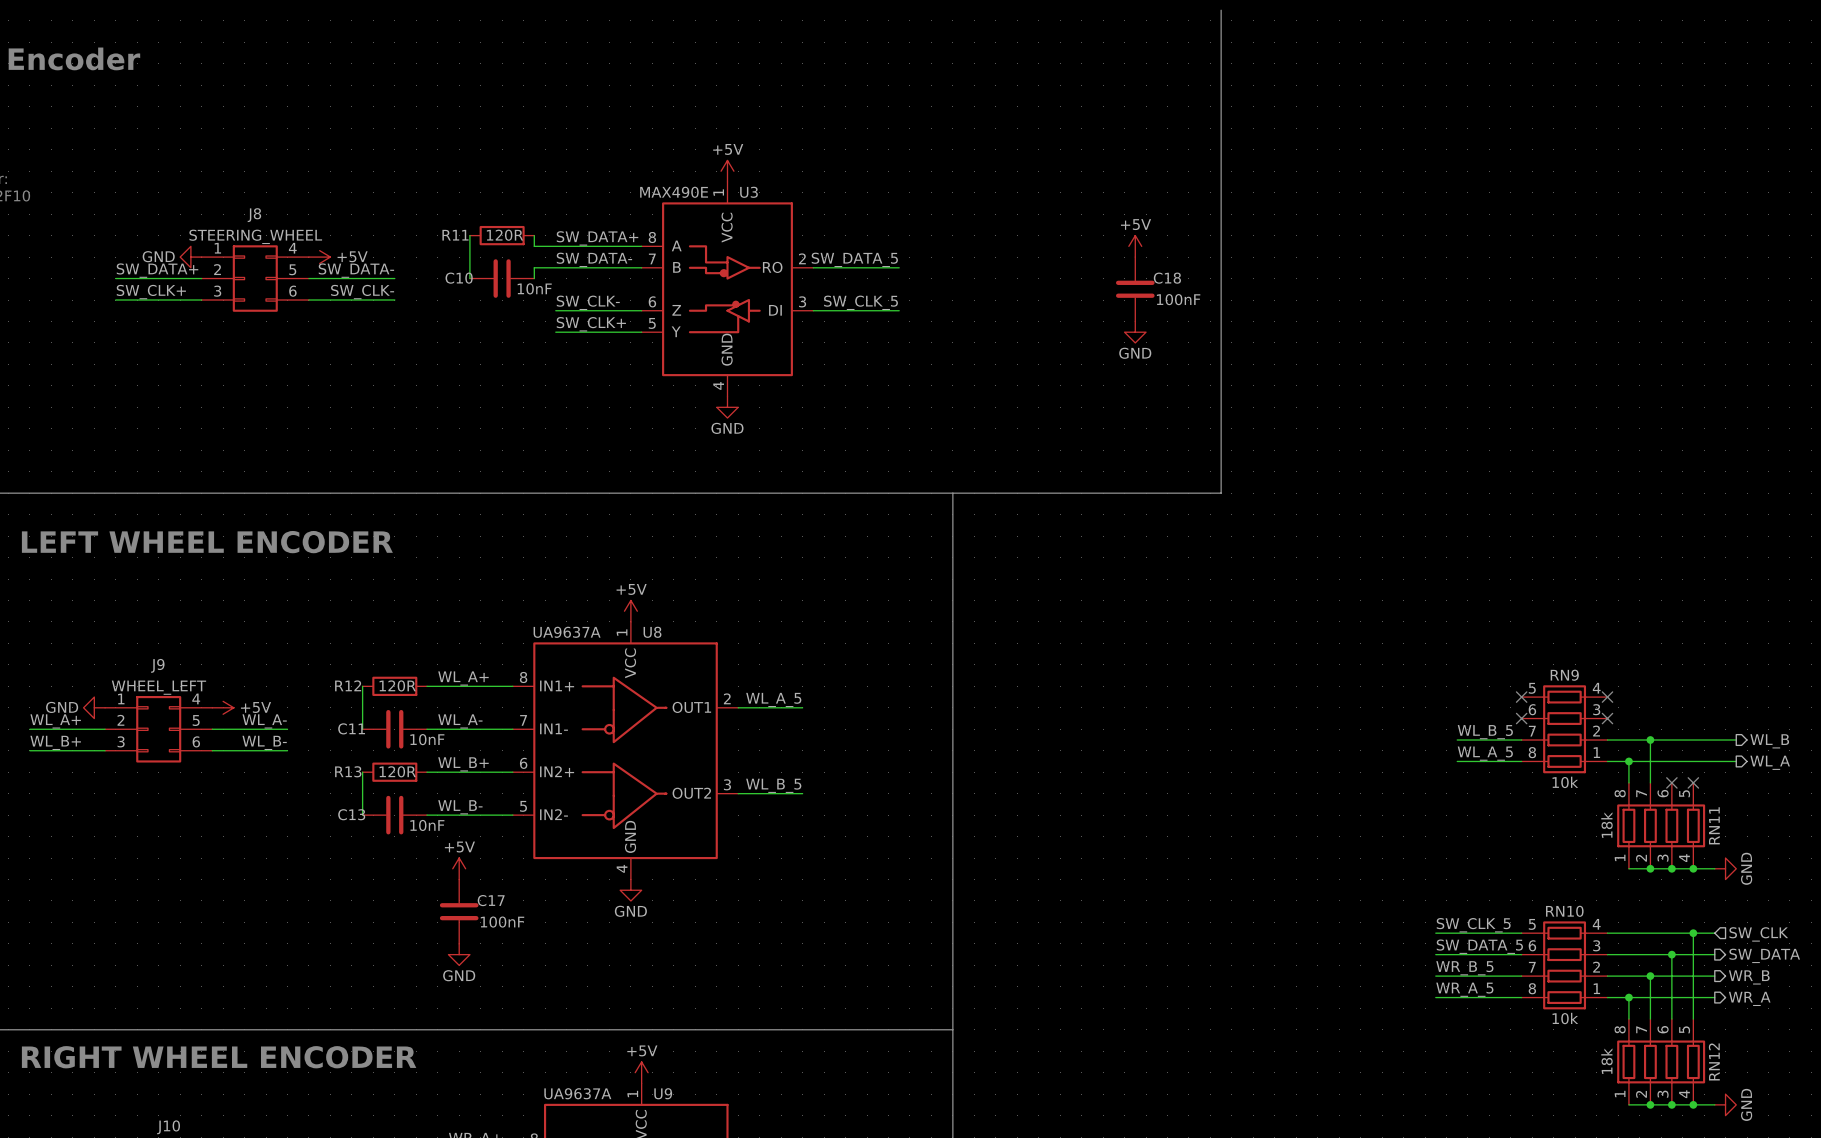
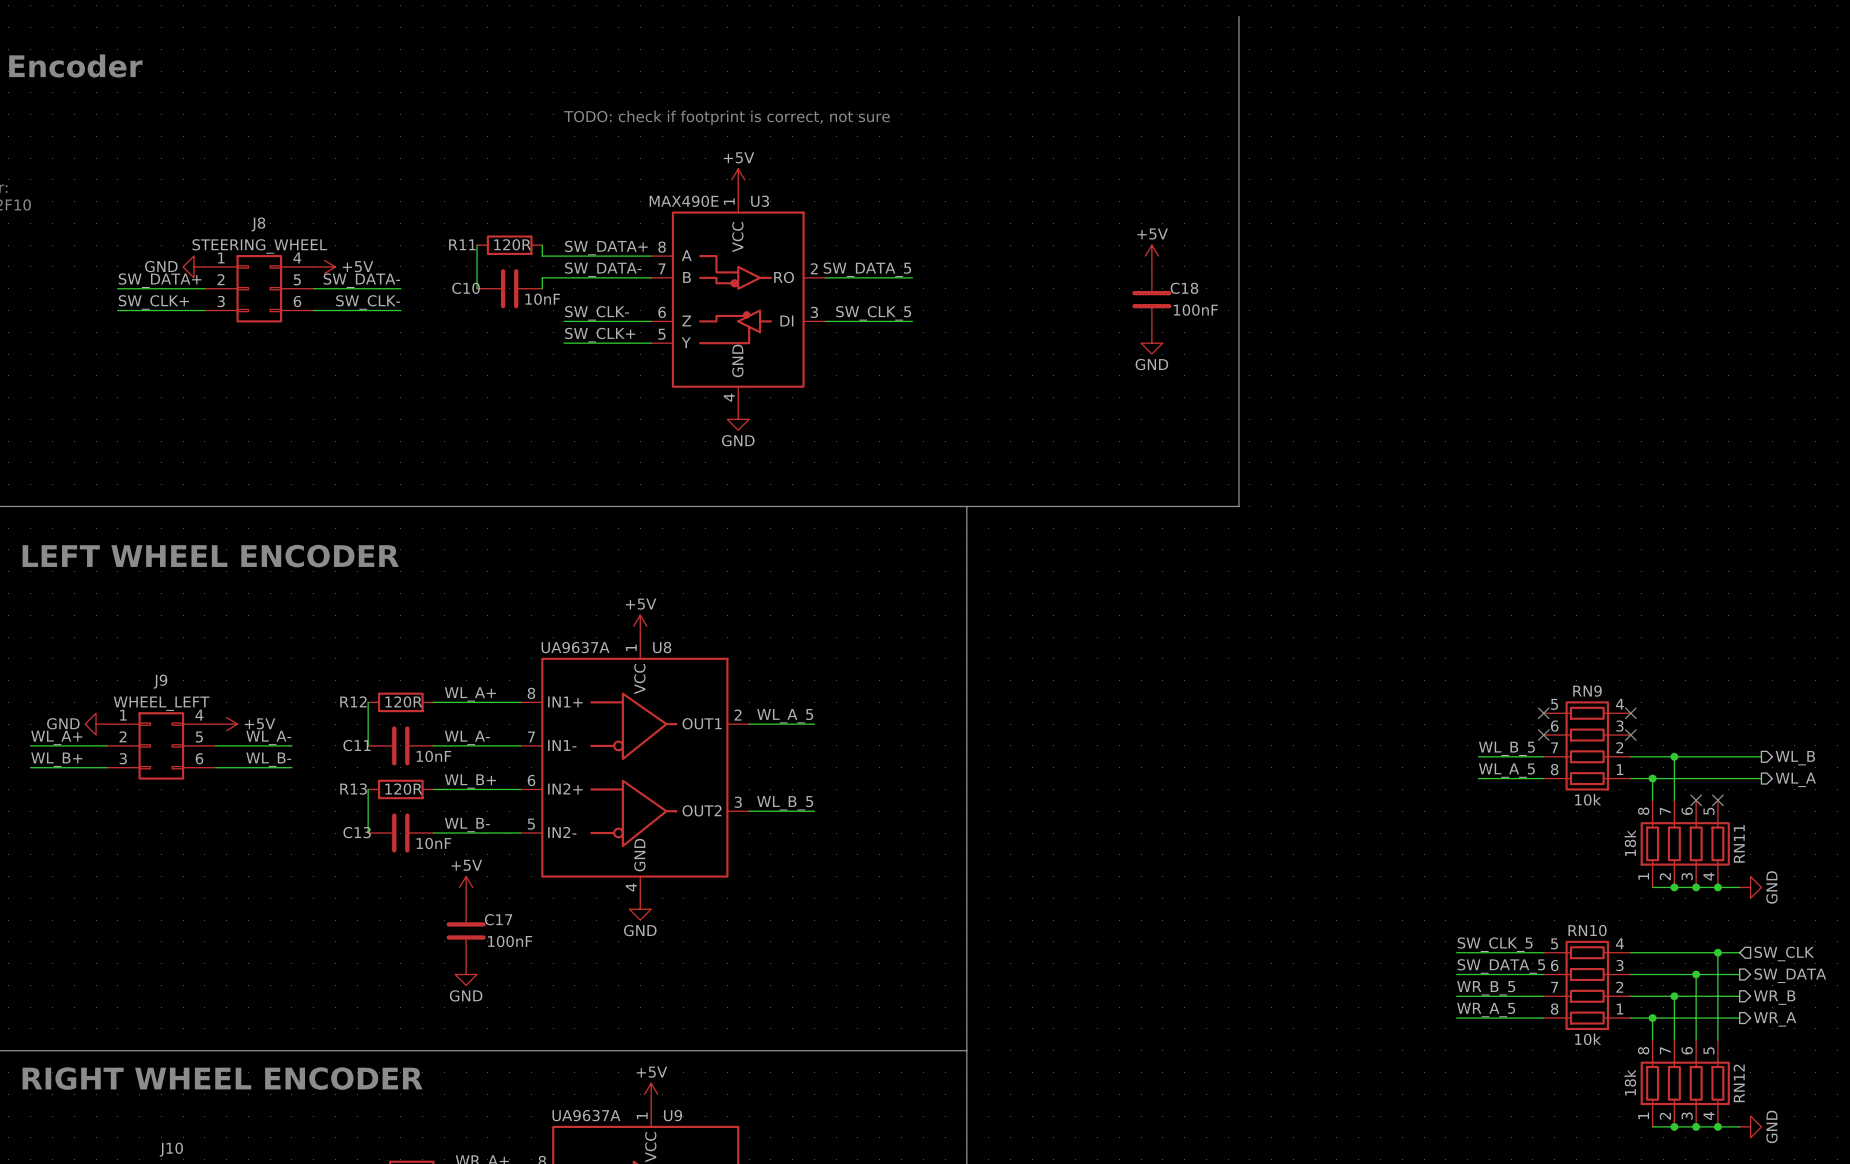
text: none -> TODO: check if footprint is correct, not sure (726, 117)

